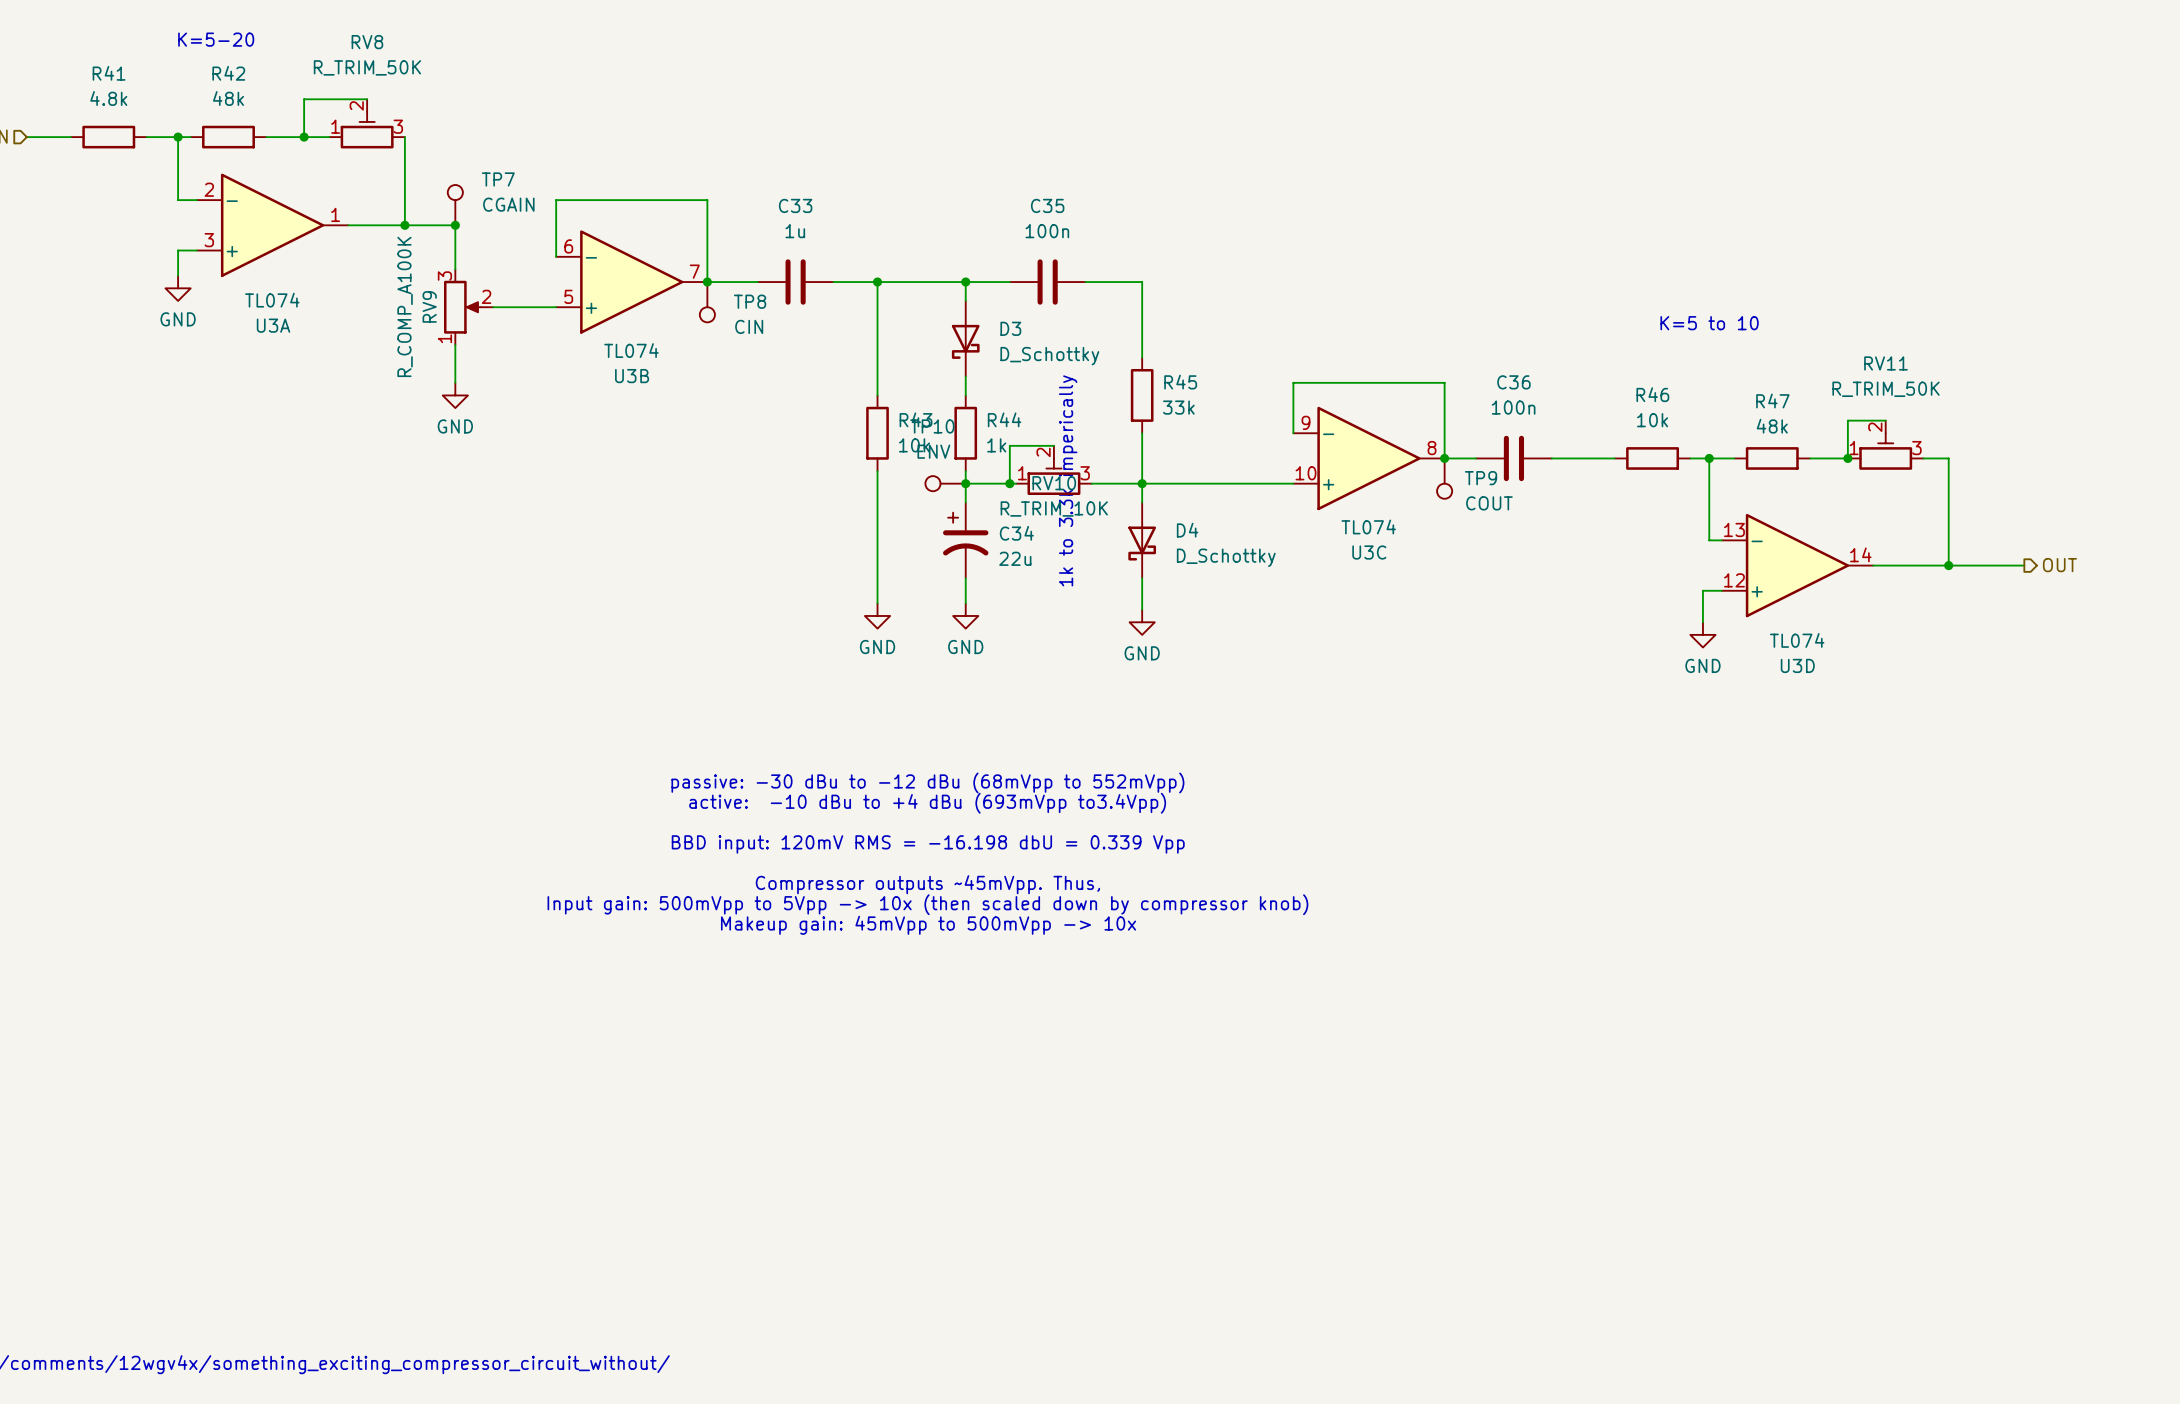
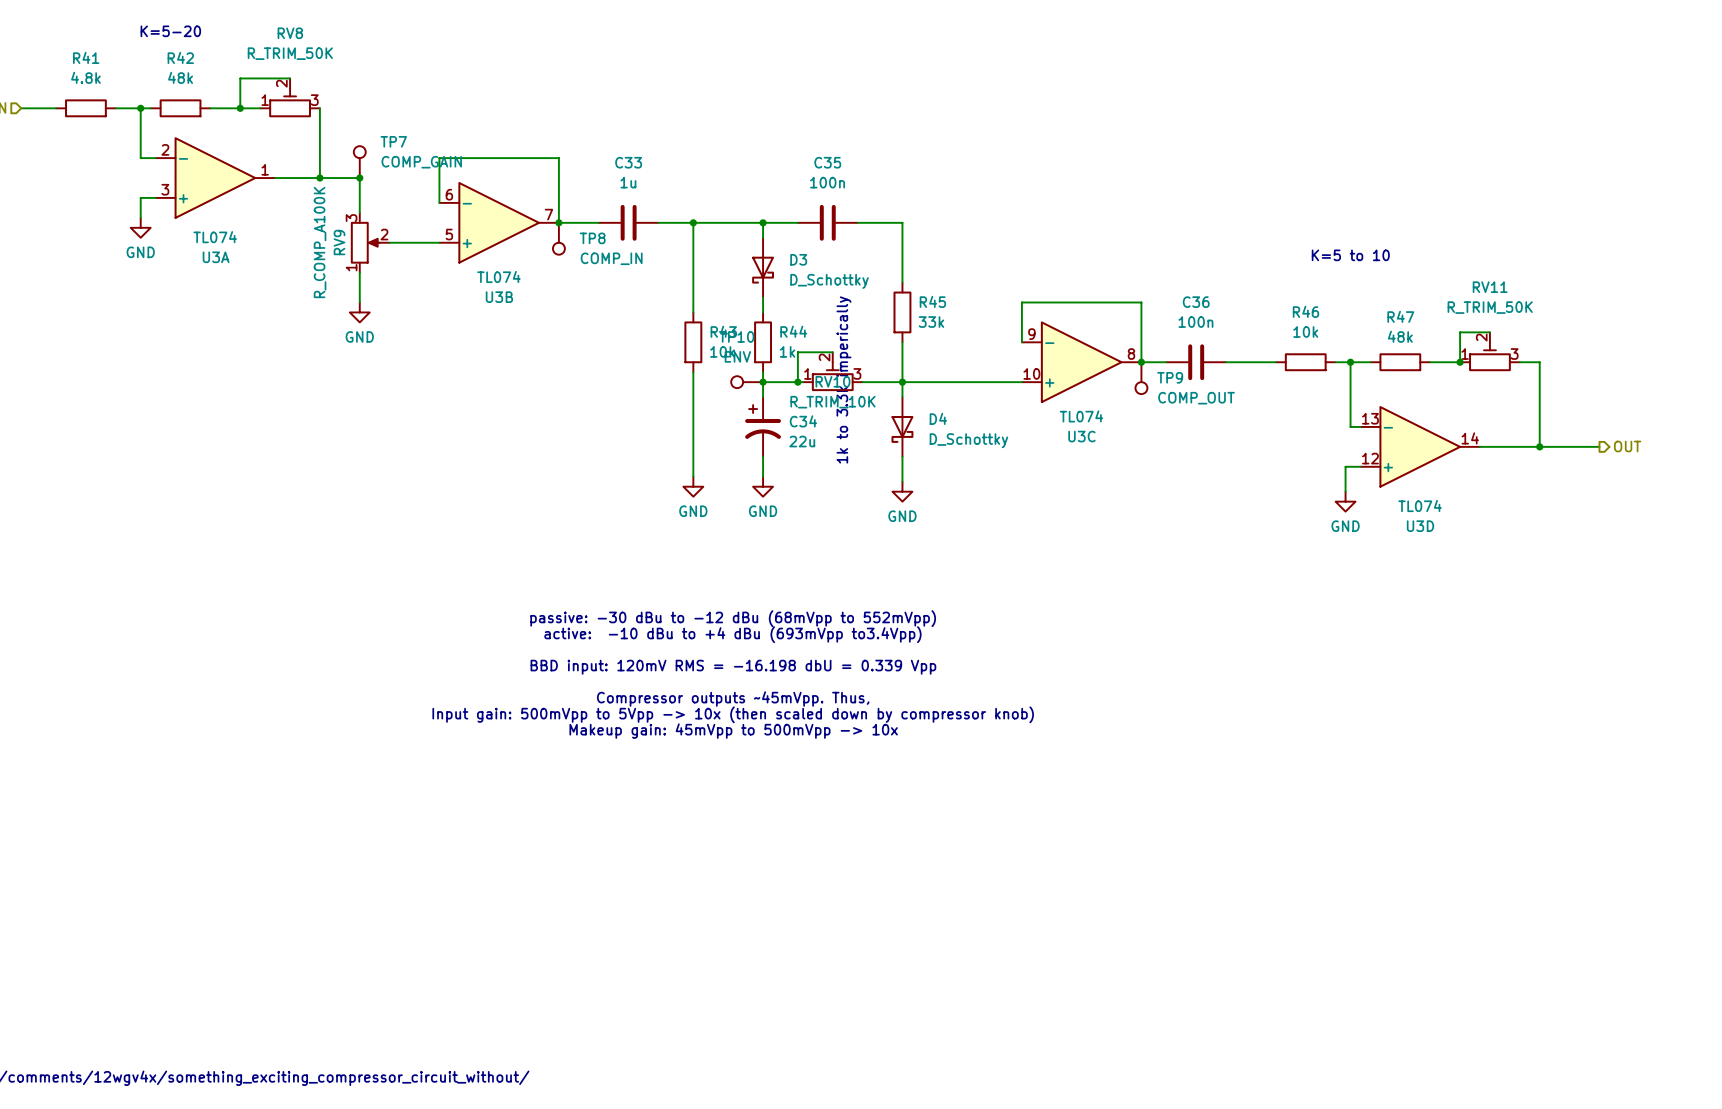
TP7 value: CGAIN (508, 204) -> COMP_GAIN (421, 162)
TP8 value: CIN (749, 326) -> COMP_IN (611, 258)
TP9 value: COUT (1489, 503) -> COMP_OUT (1196, 398)

